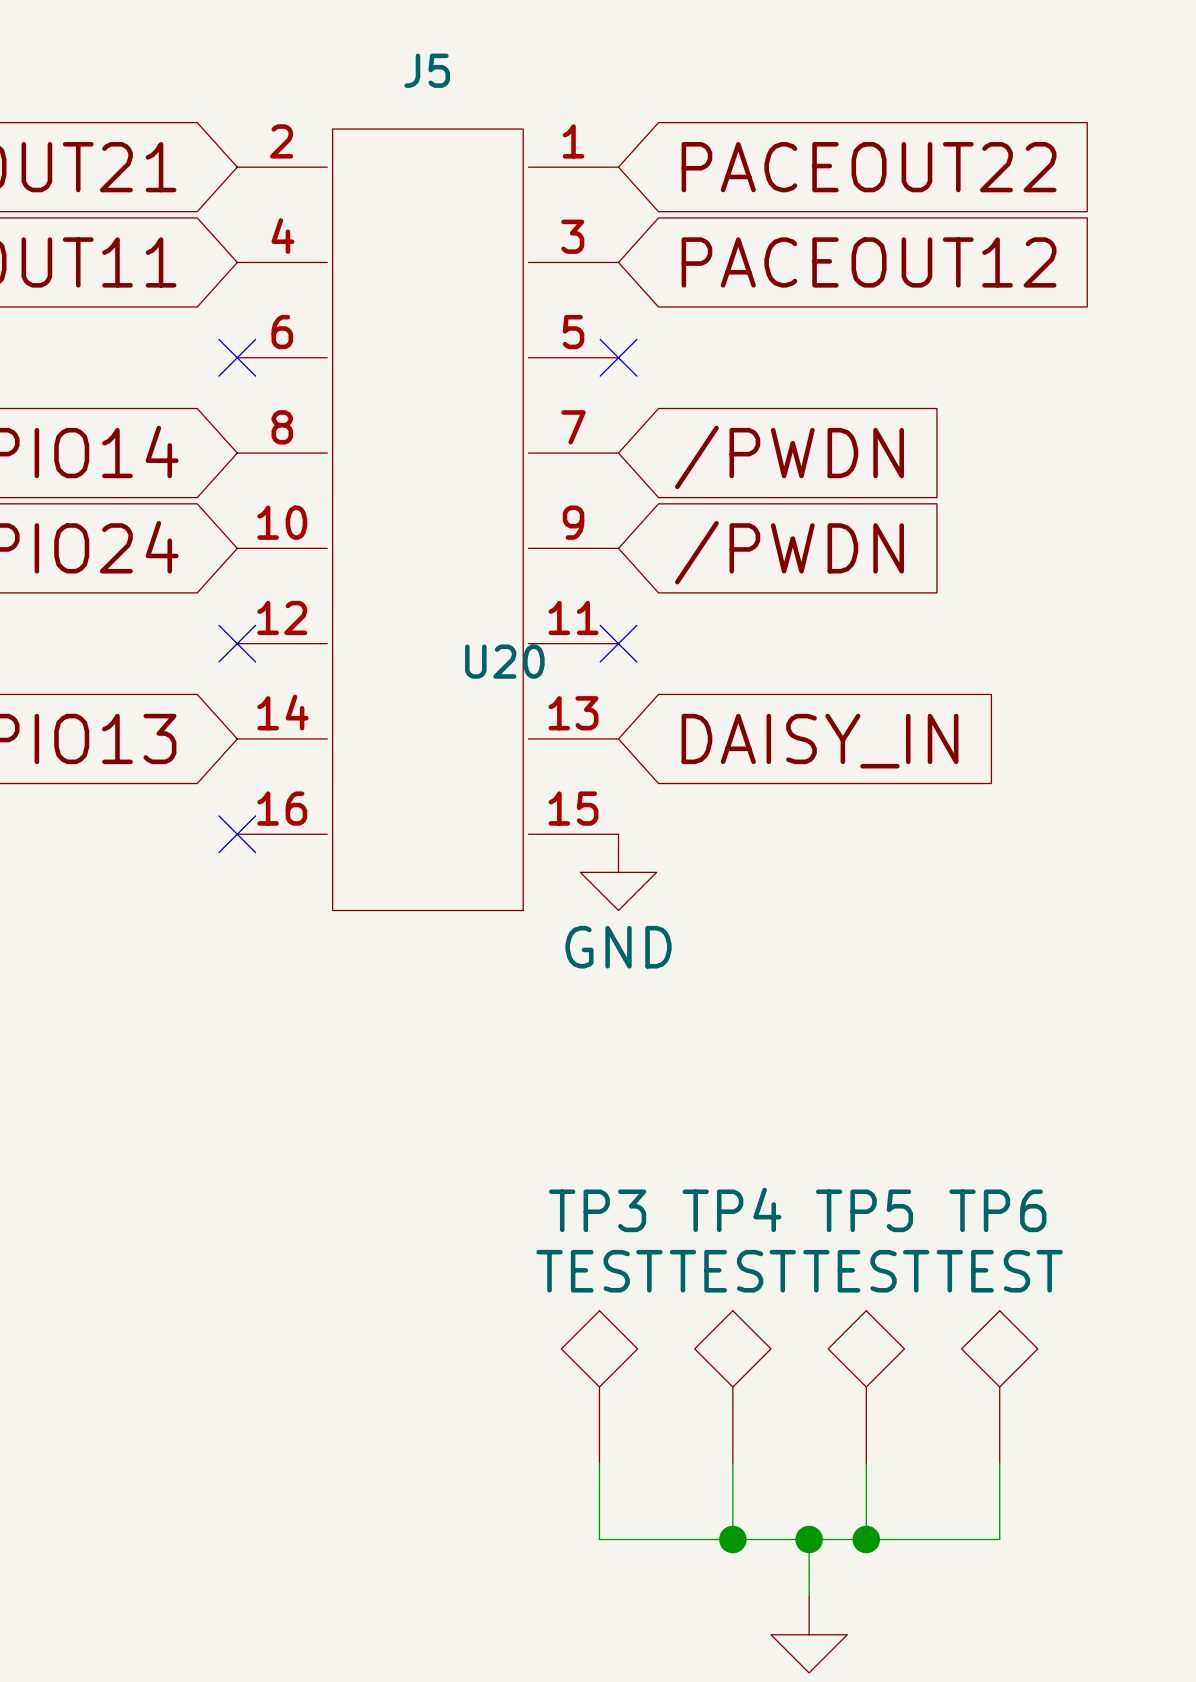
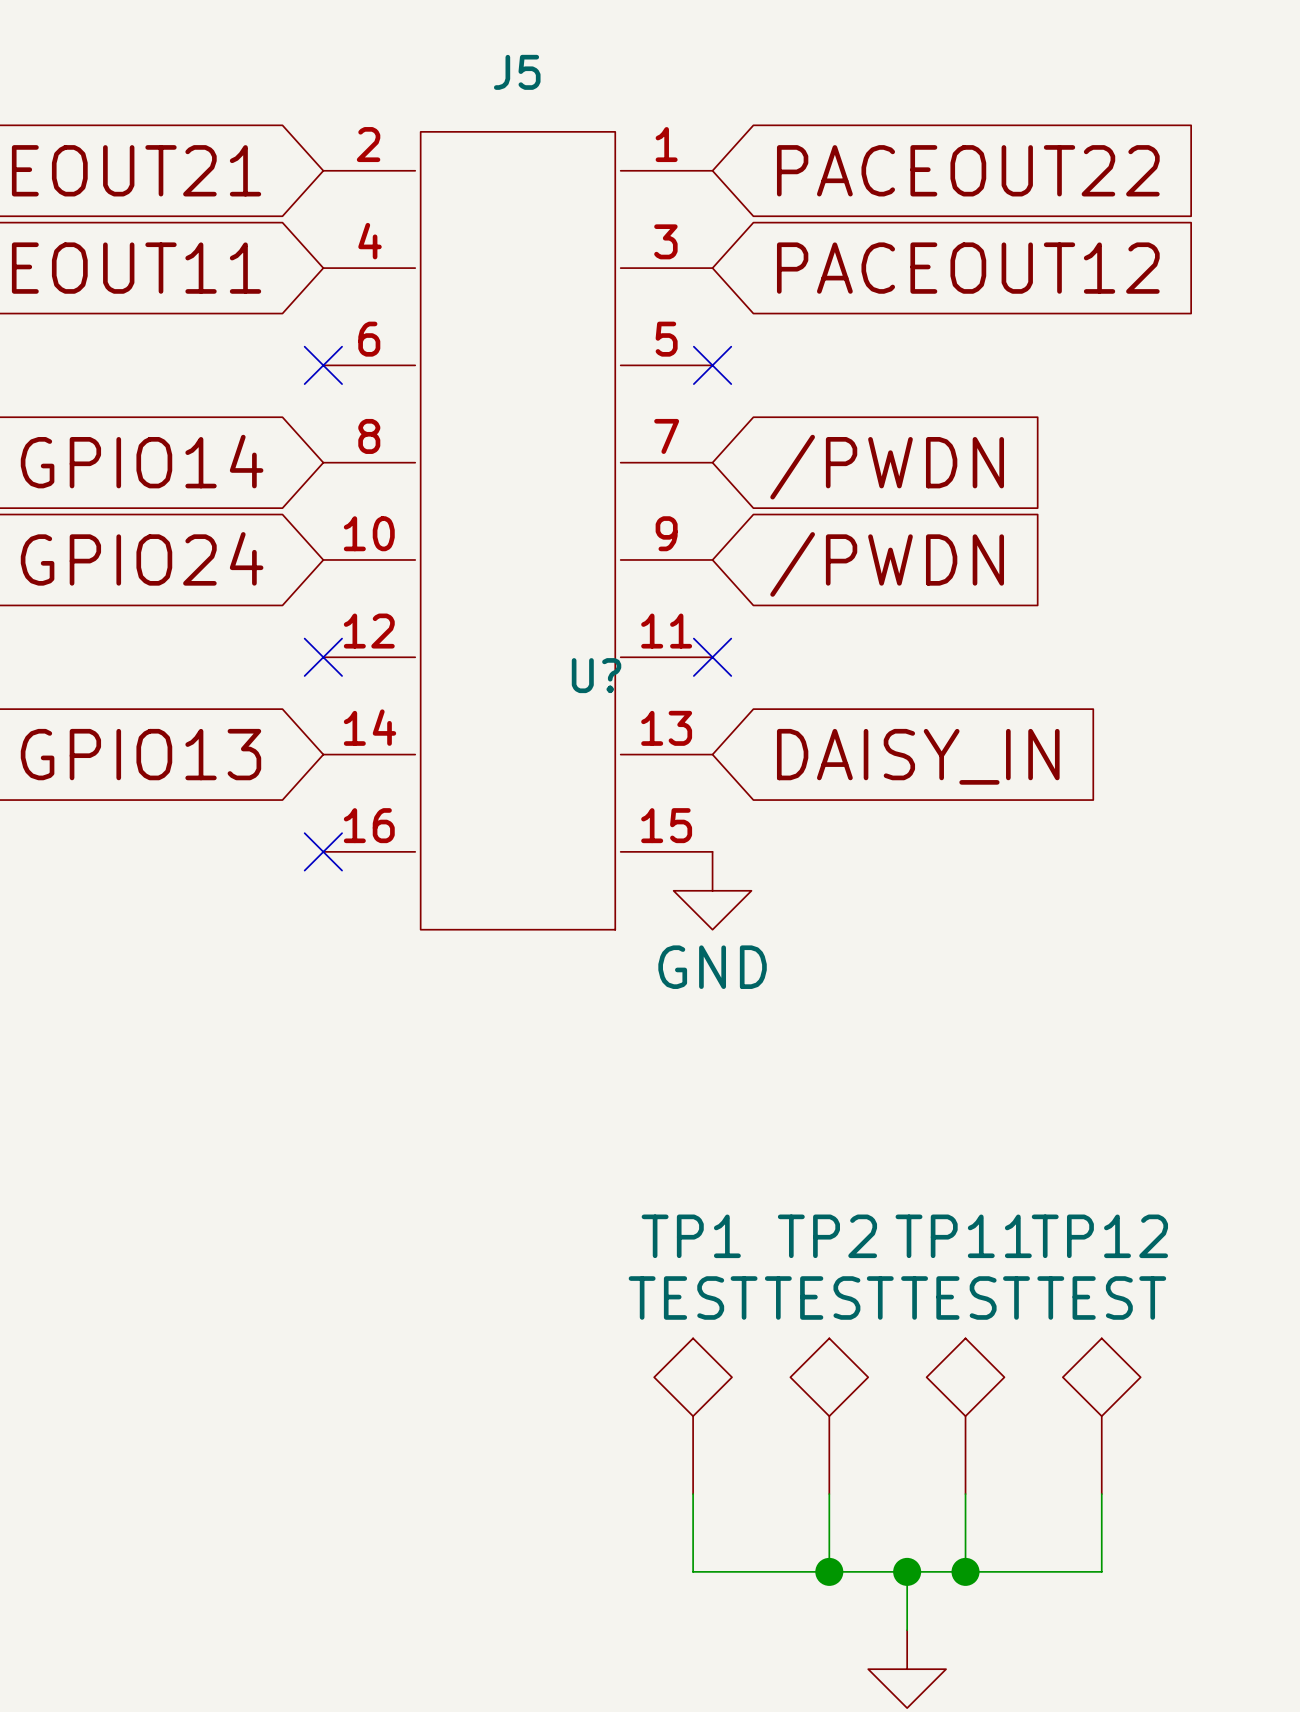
U20 name: U20 (504, 661) -> U? (596, 675)
TP4 name: TP4 (731, 1209) -> TP2 (827, 1236)
TP3 name: TP3 (597, 1210) -> TP1 (691, 1236)
TP5 name: TP5 (864, 1210) -> TP11 (963, 1236)
TP6 name: TP6 (997, 1210) -> TP12 (1099, 1236)

